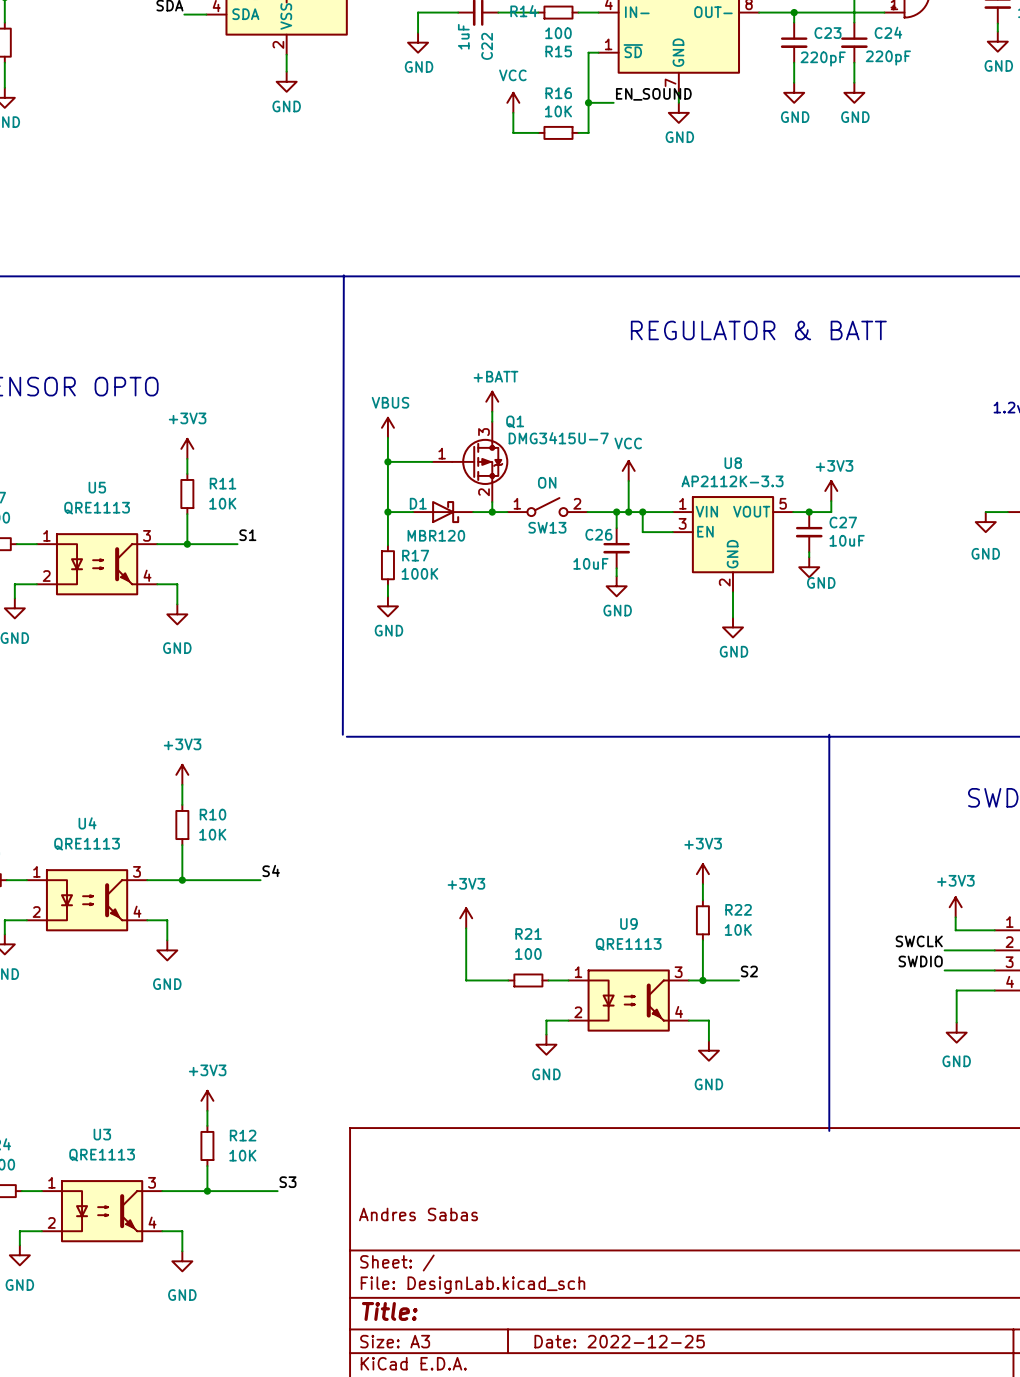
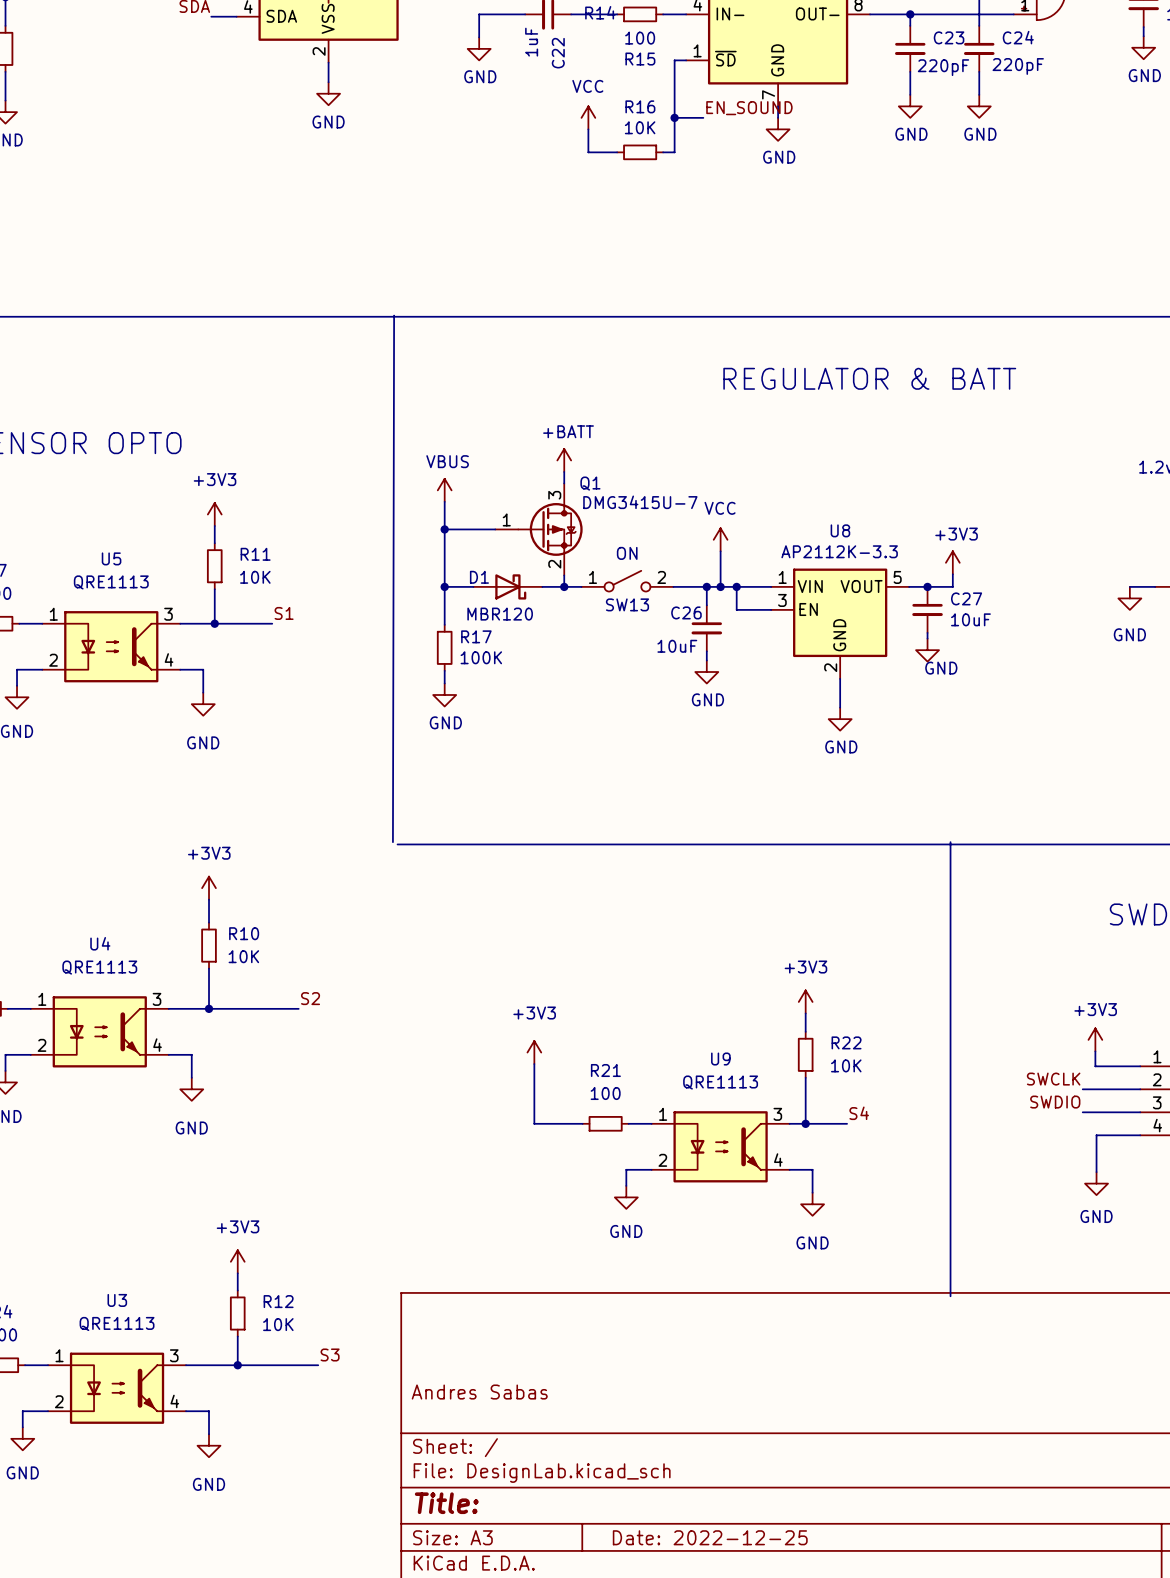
label: S4 (271, 870) -> S2 (310, 998)
label: S2 (749, 971) -> S4 (859, 1113)

